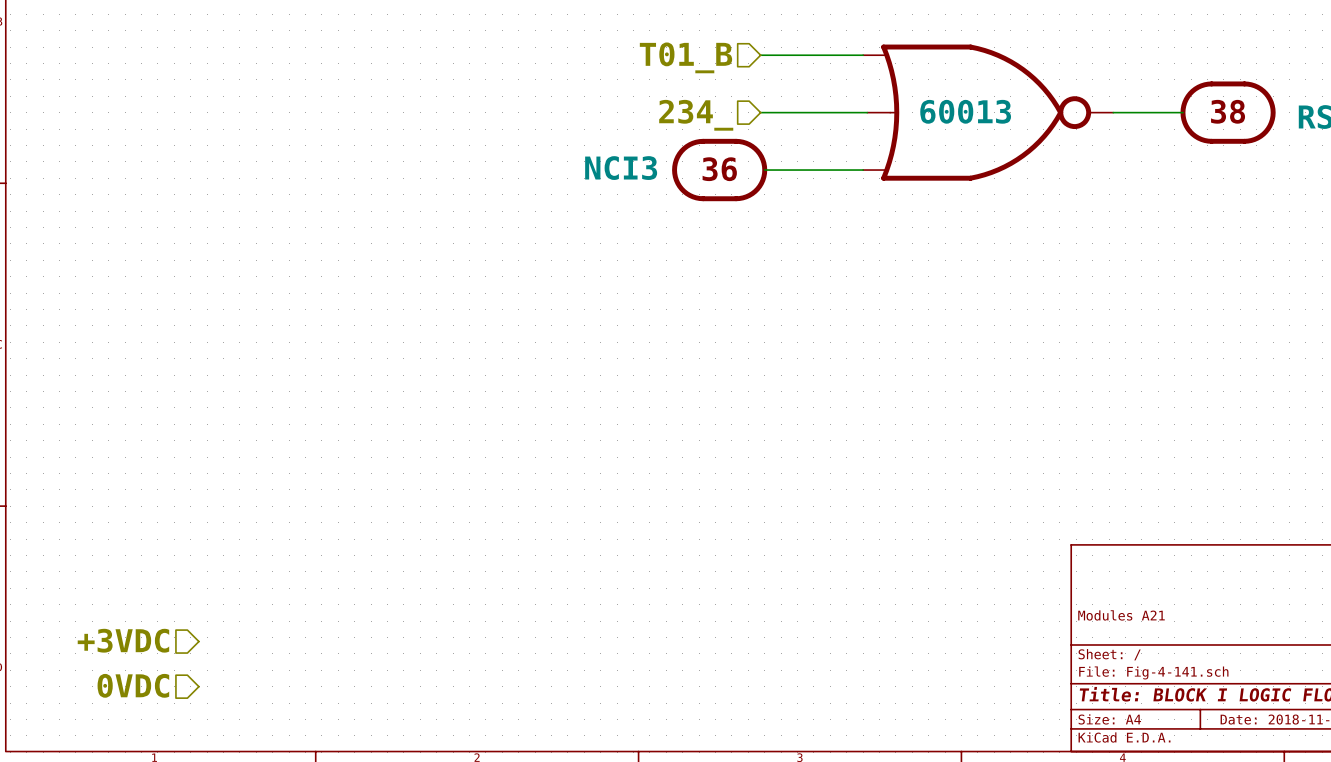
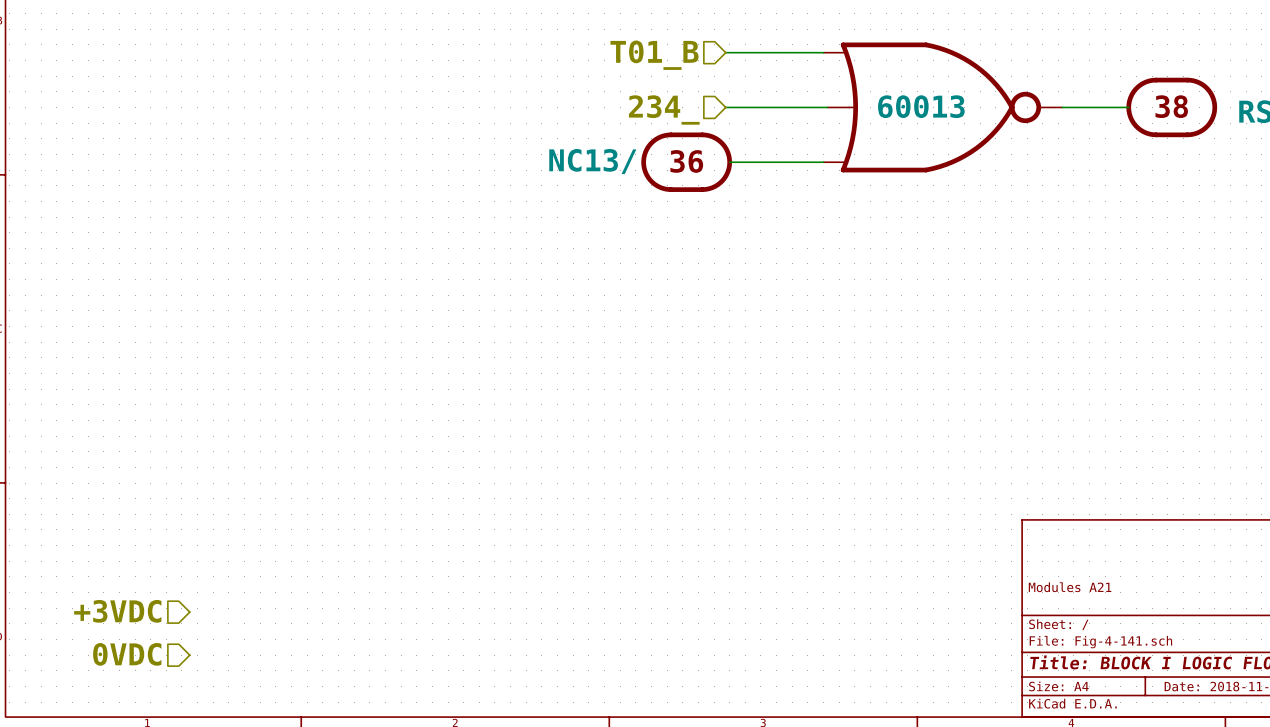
part text: NCI3 (621, 168) -> NC13/ (592, 161)

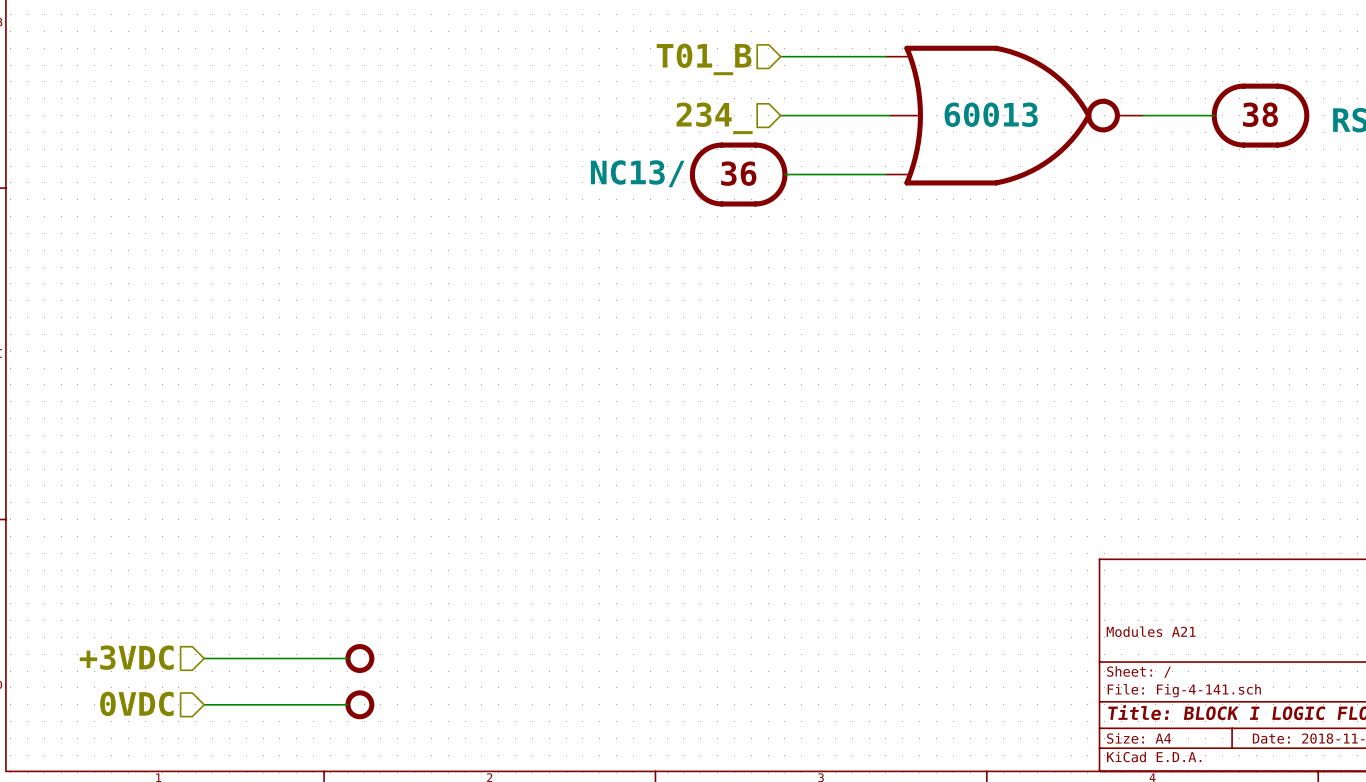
wire: none -> (204, 658) (347, 658)
part: none -> (359, 658)
wire: none -> (204, 704) (347, 704)
part: none -> (359, 704)

